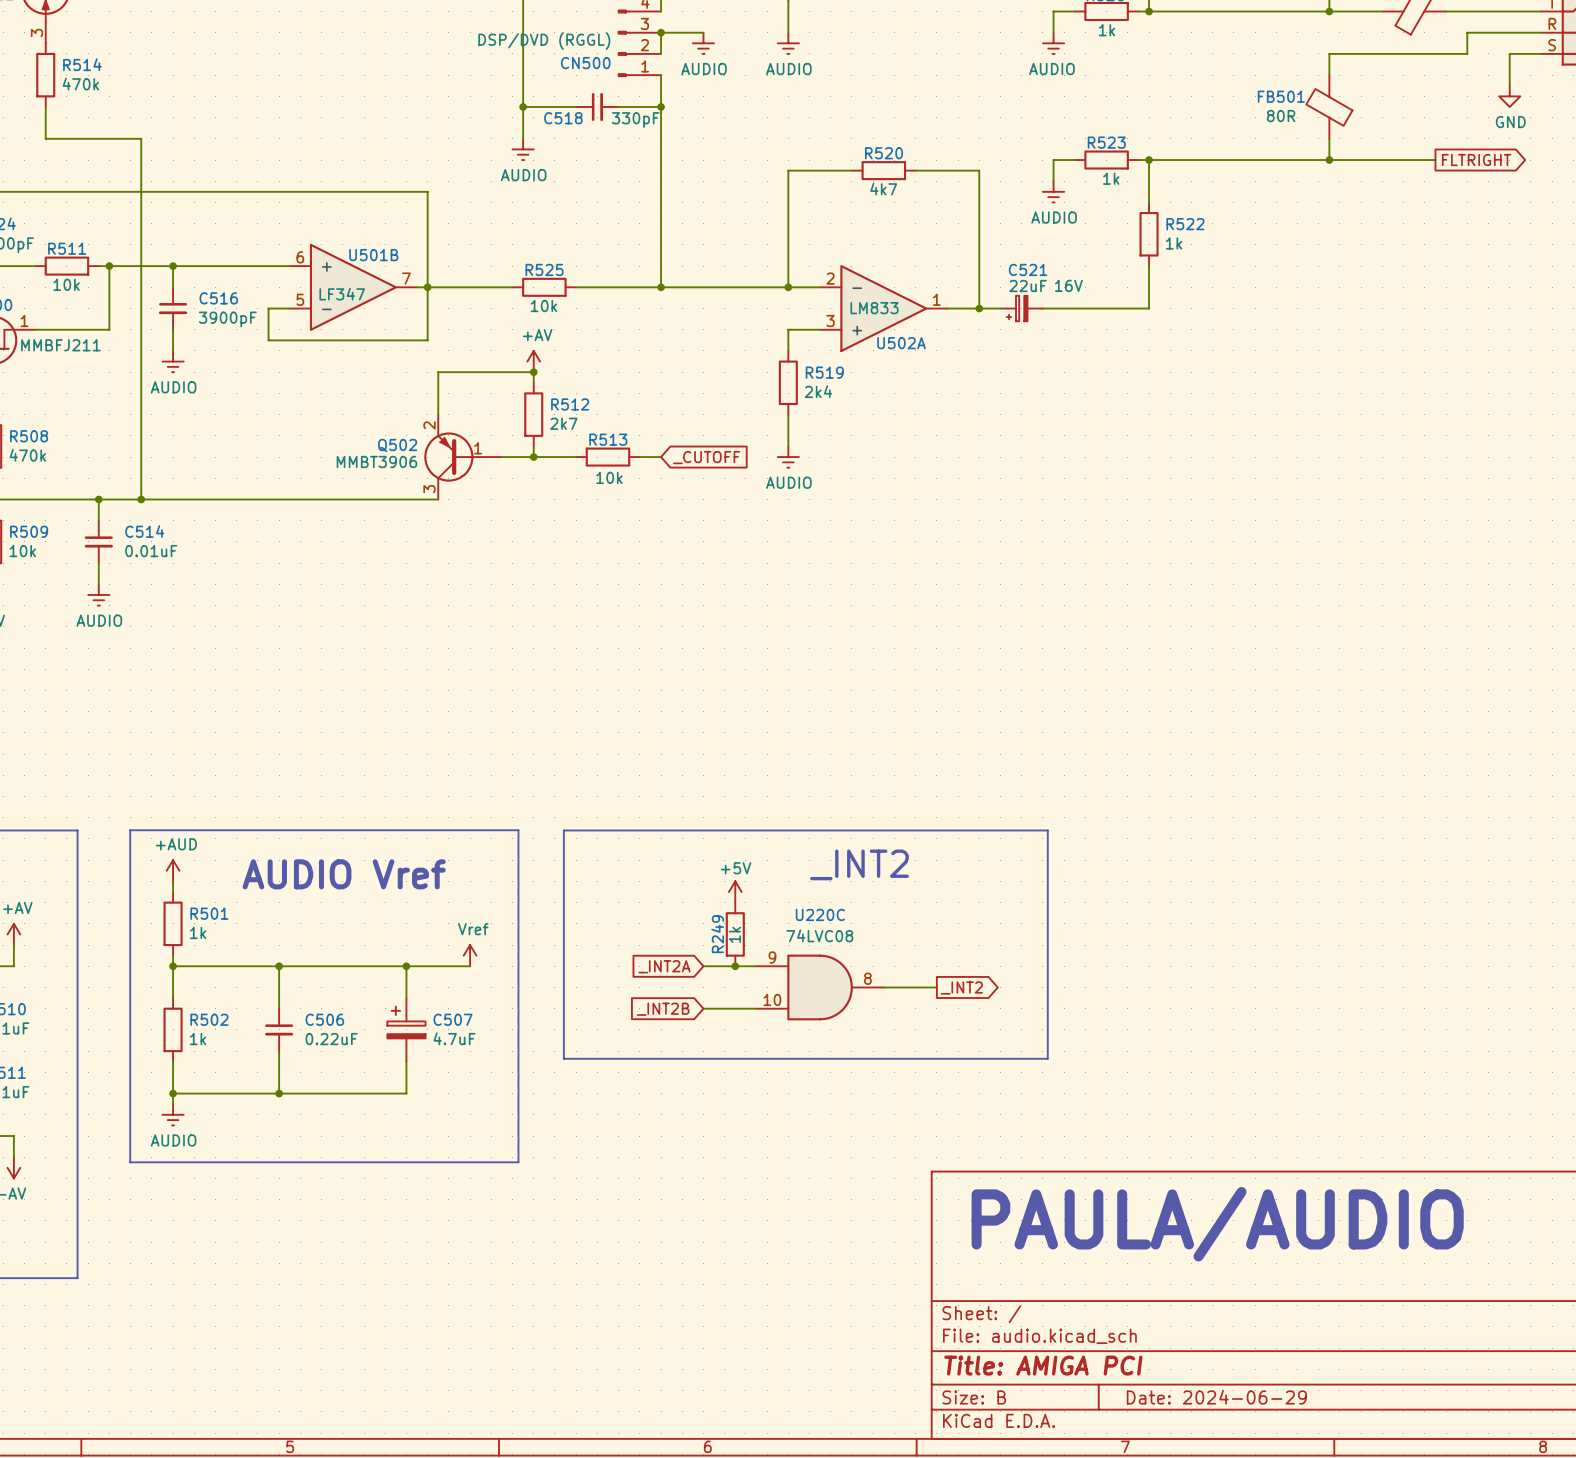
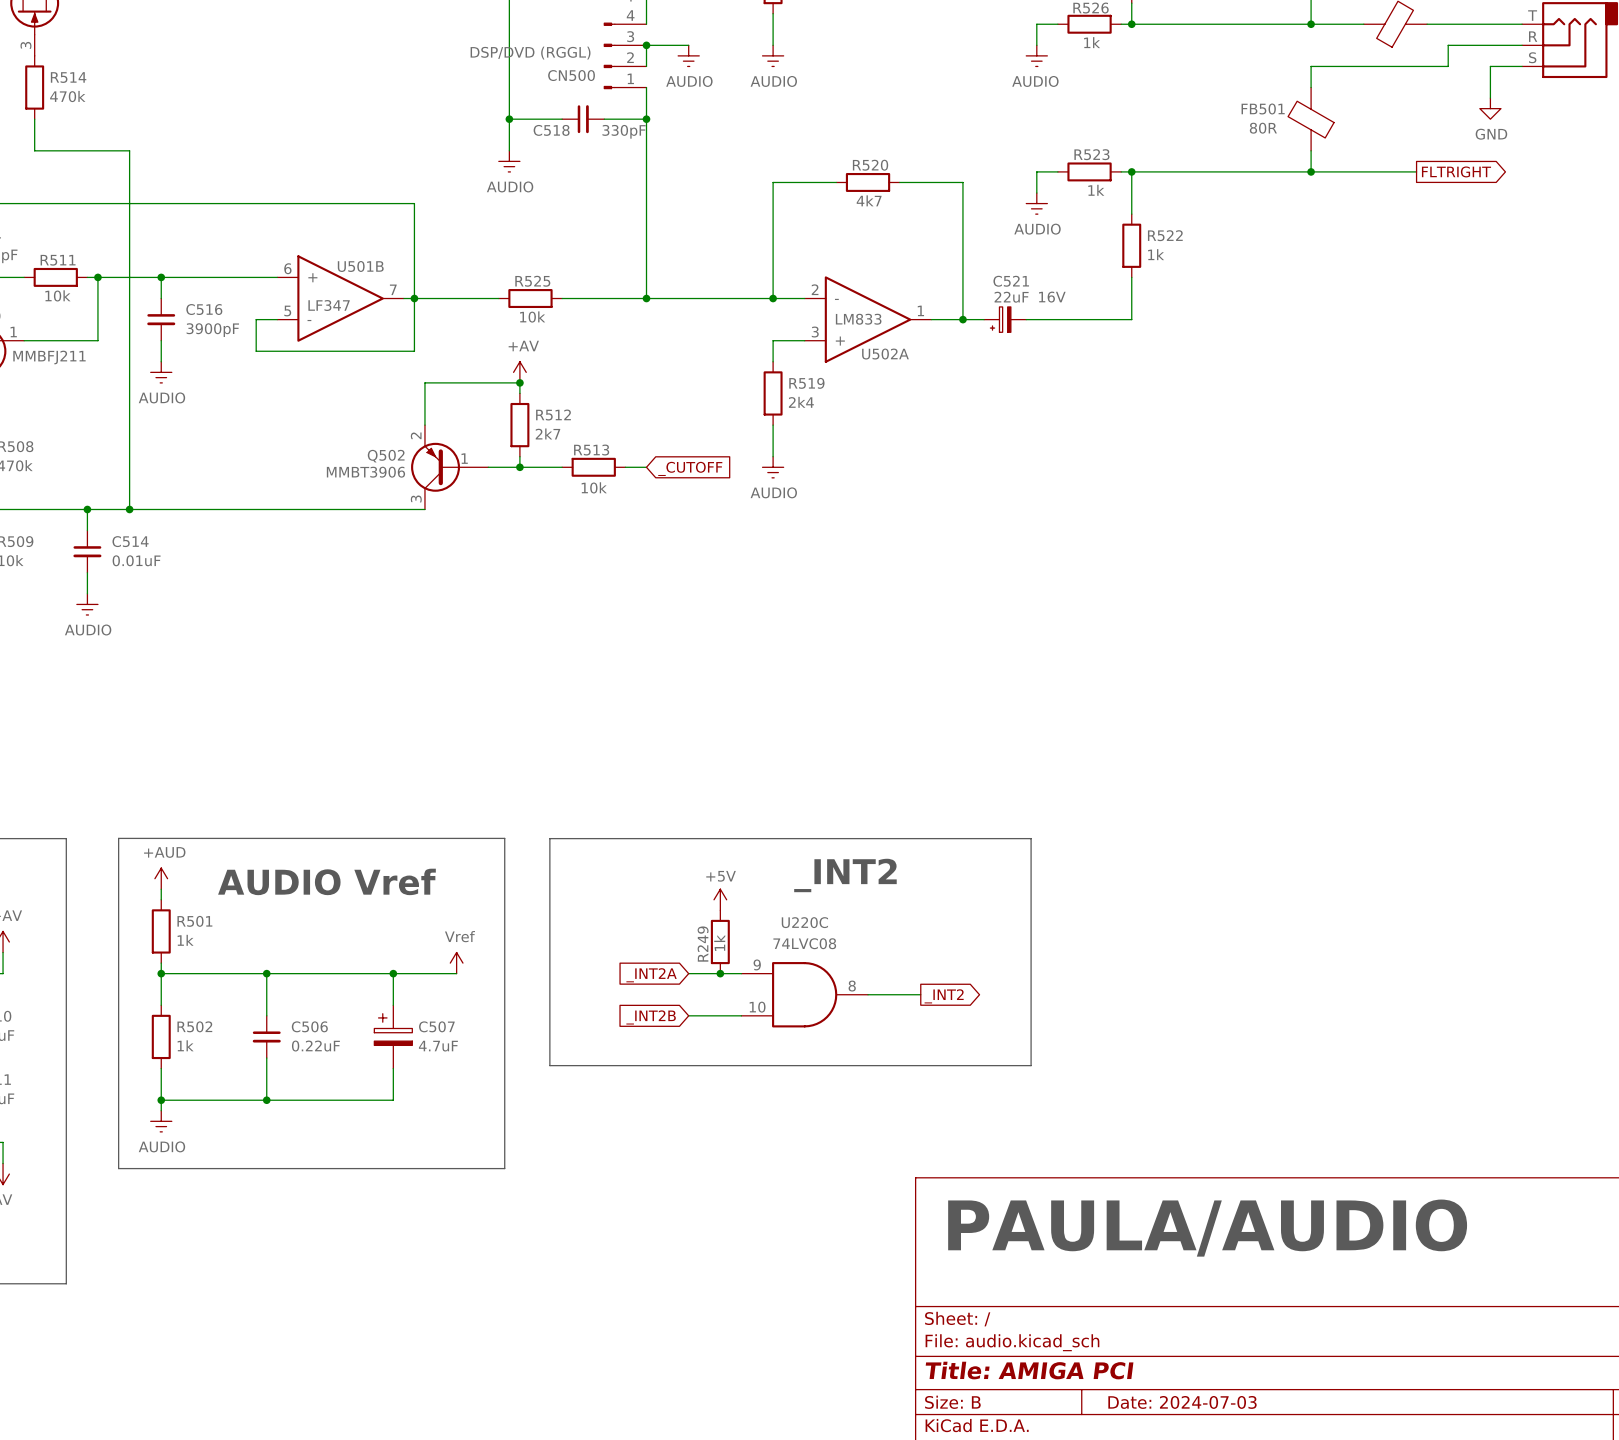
title block: Date: 2024-06-29 (1216, 1397) -> Date: 2024-07-03 (1182, 1402)

